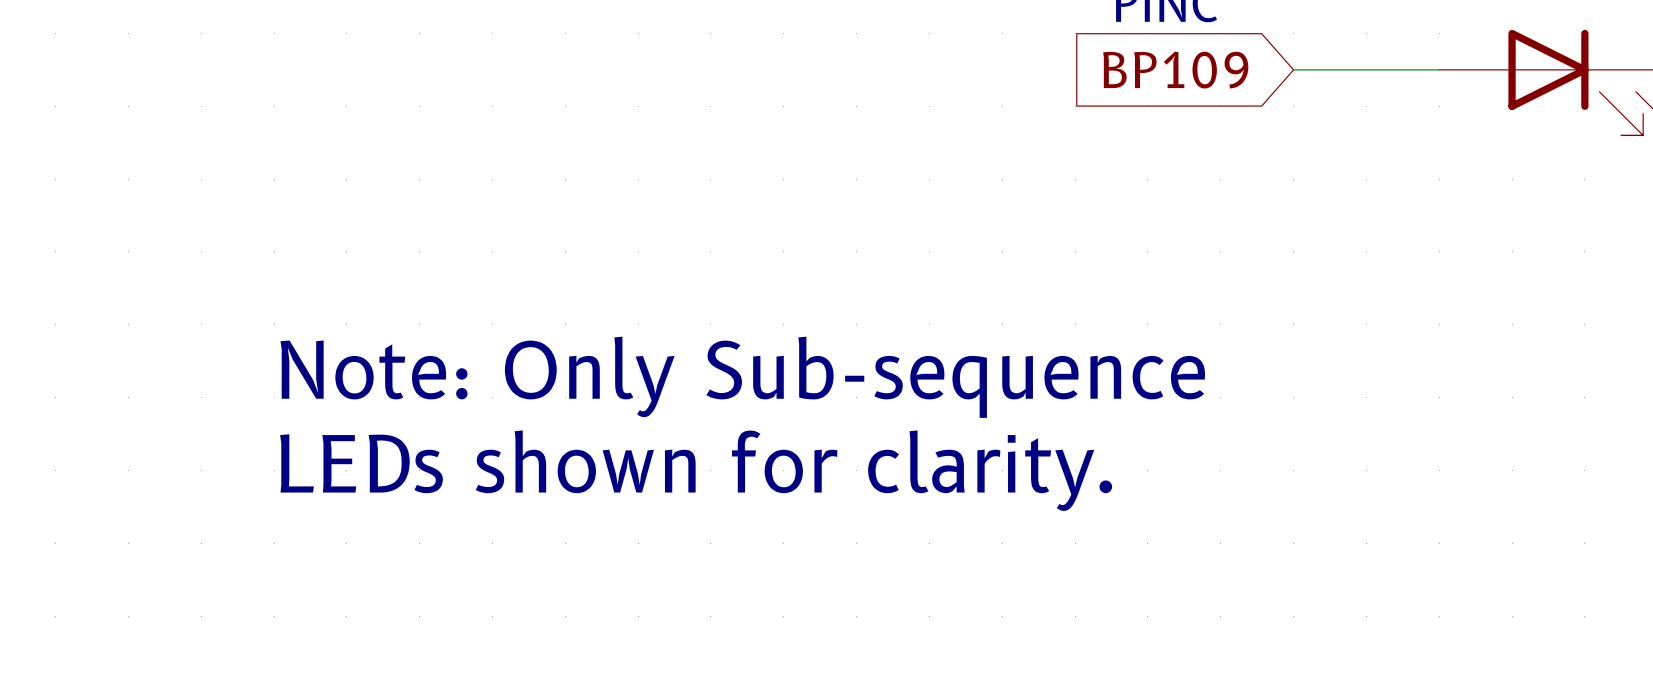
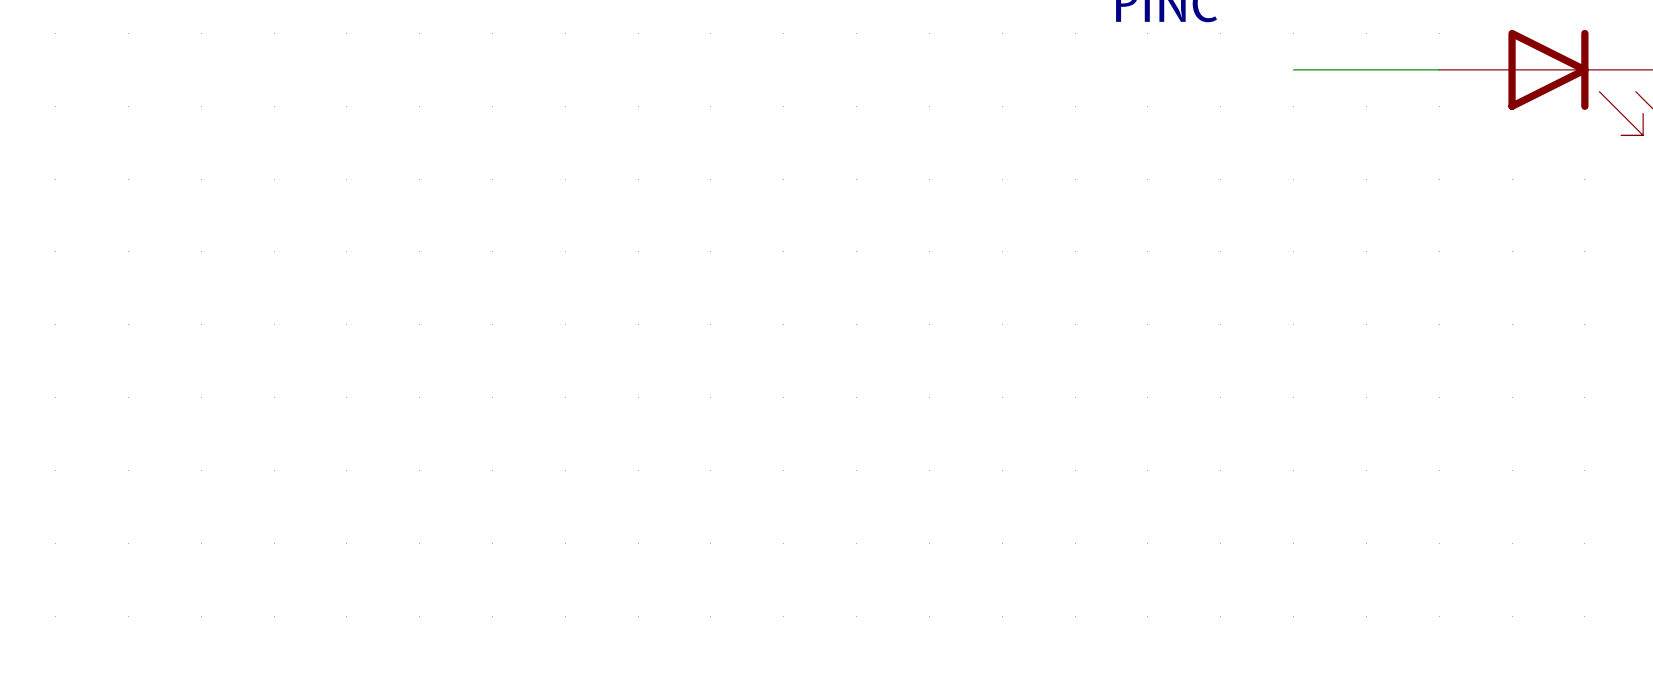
global label: BP109 (1175, 70) -> none
text: Note: Only Sub-sequence (742, 377) -> none
text: LEDs shown for clarity. (696, 470) -> none

